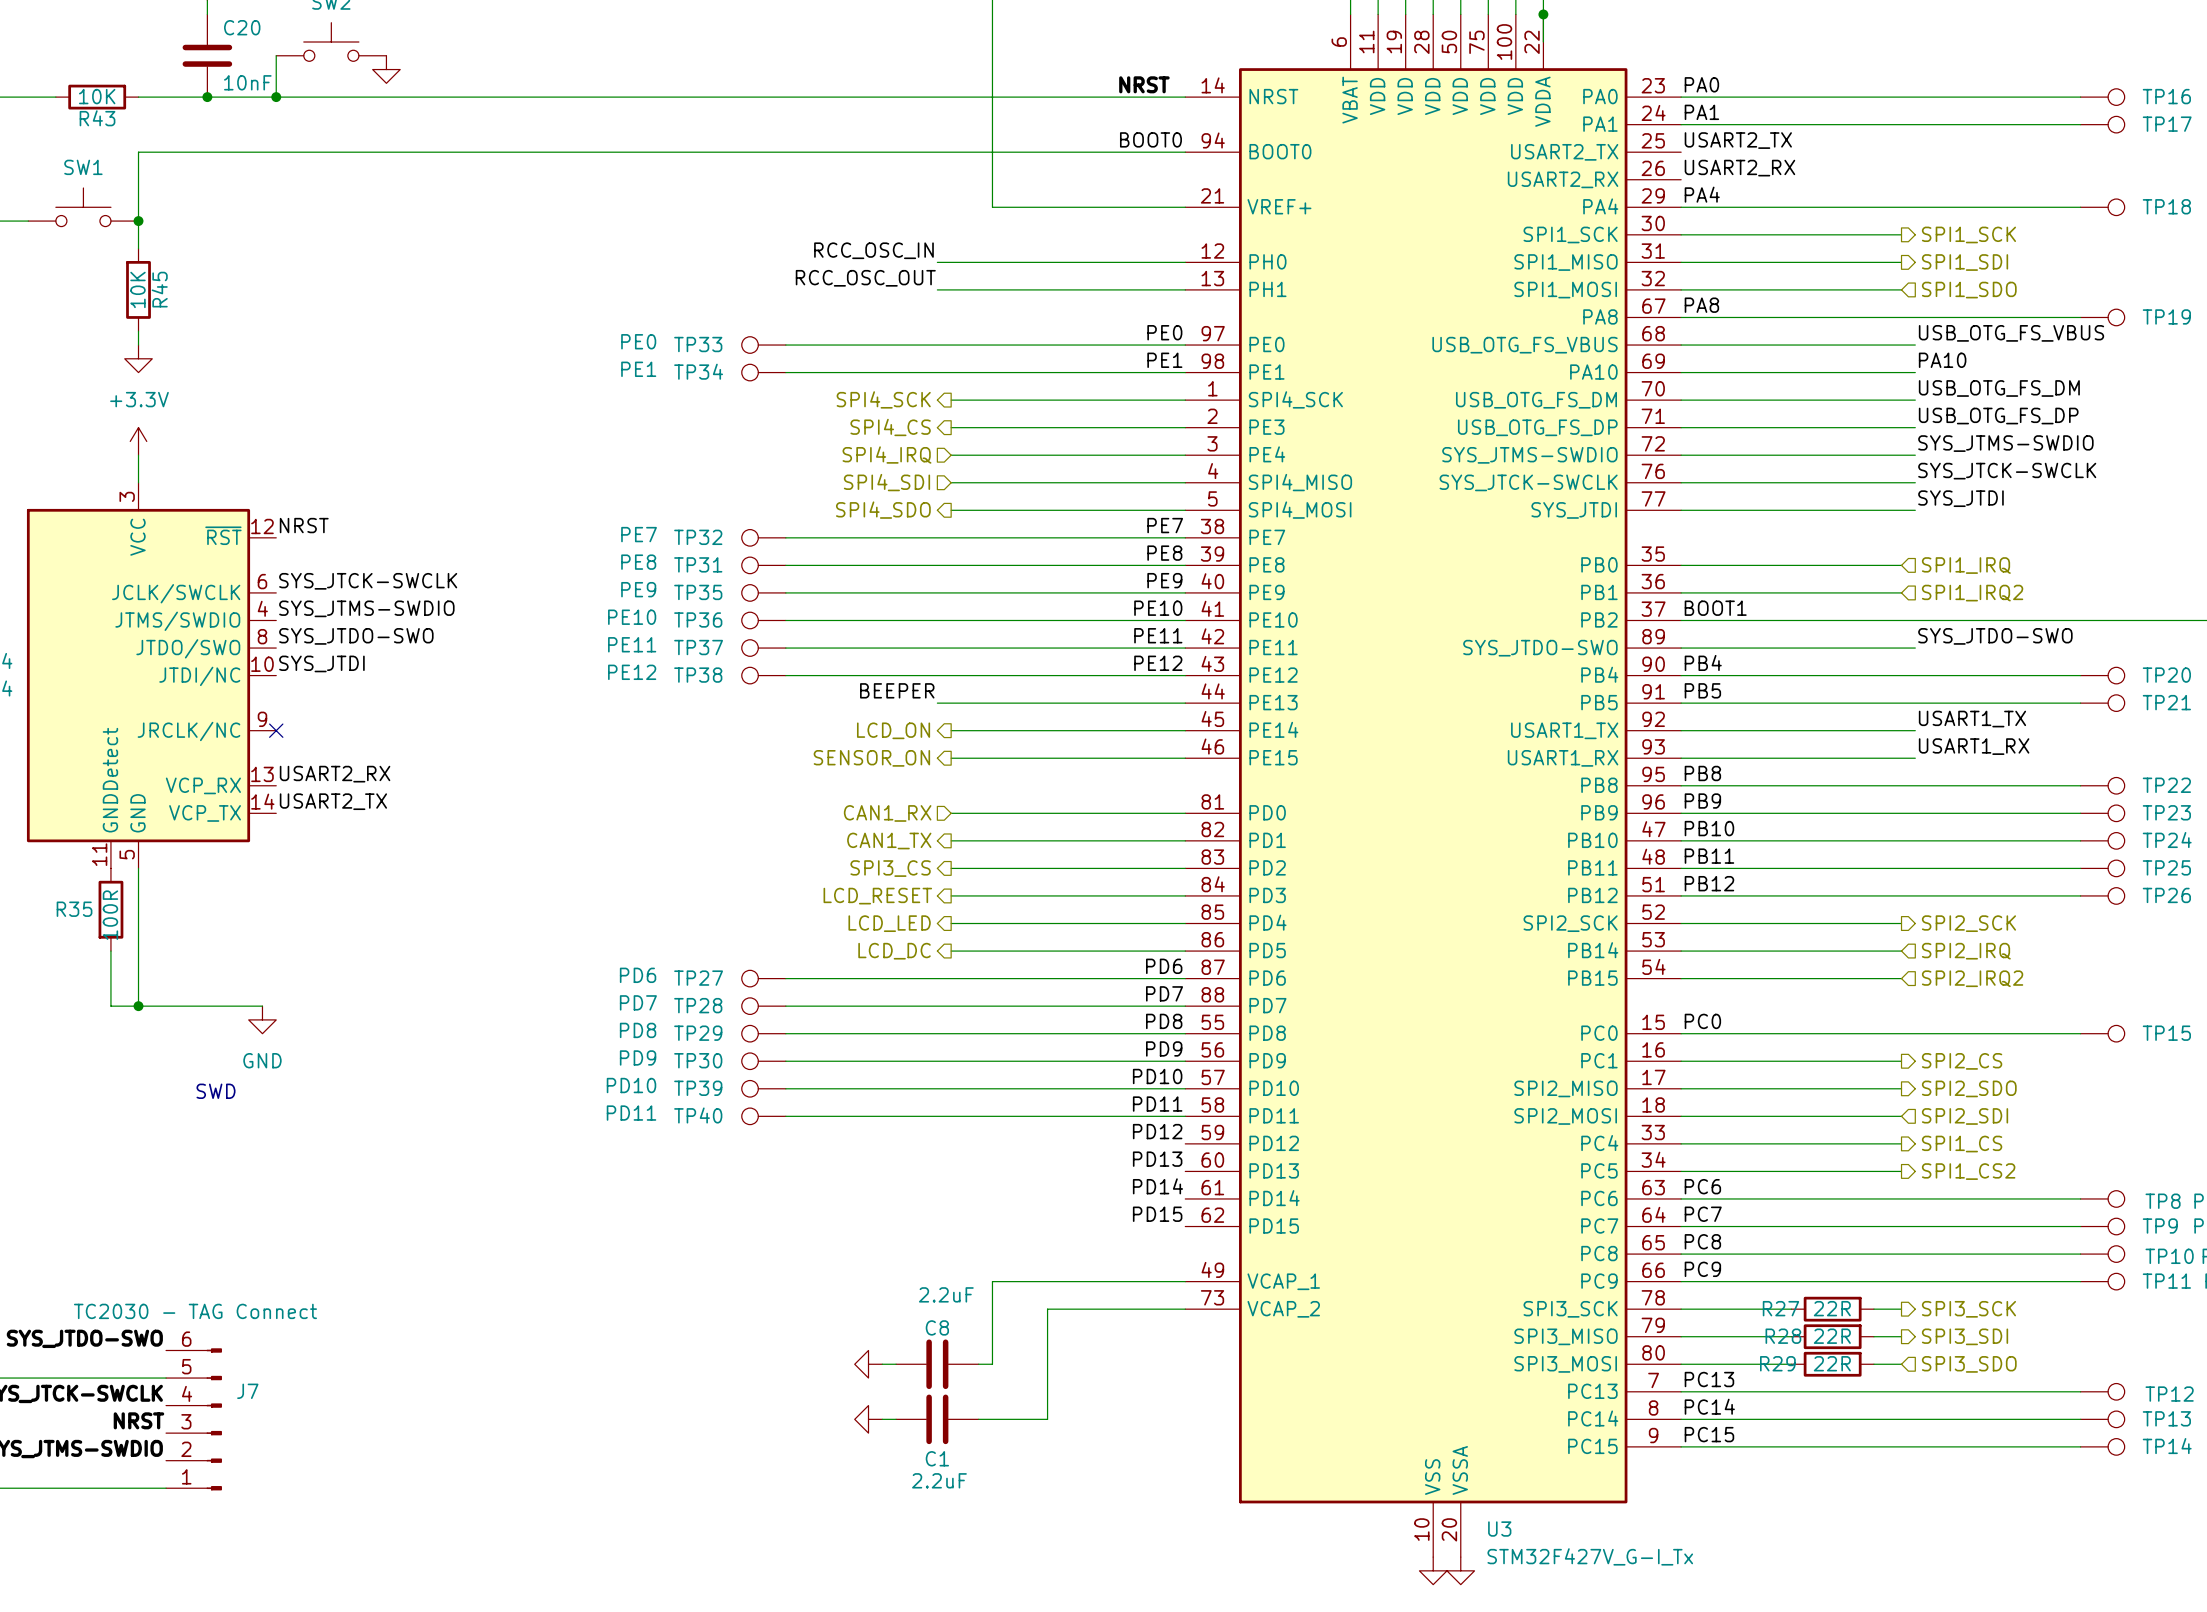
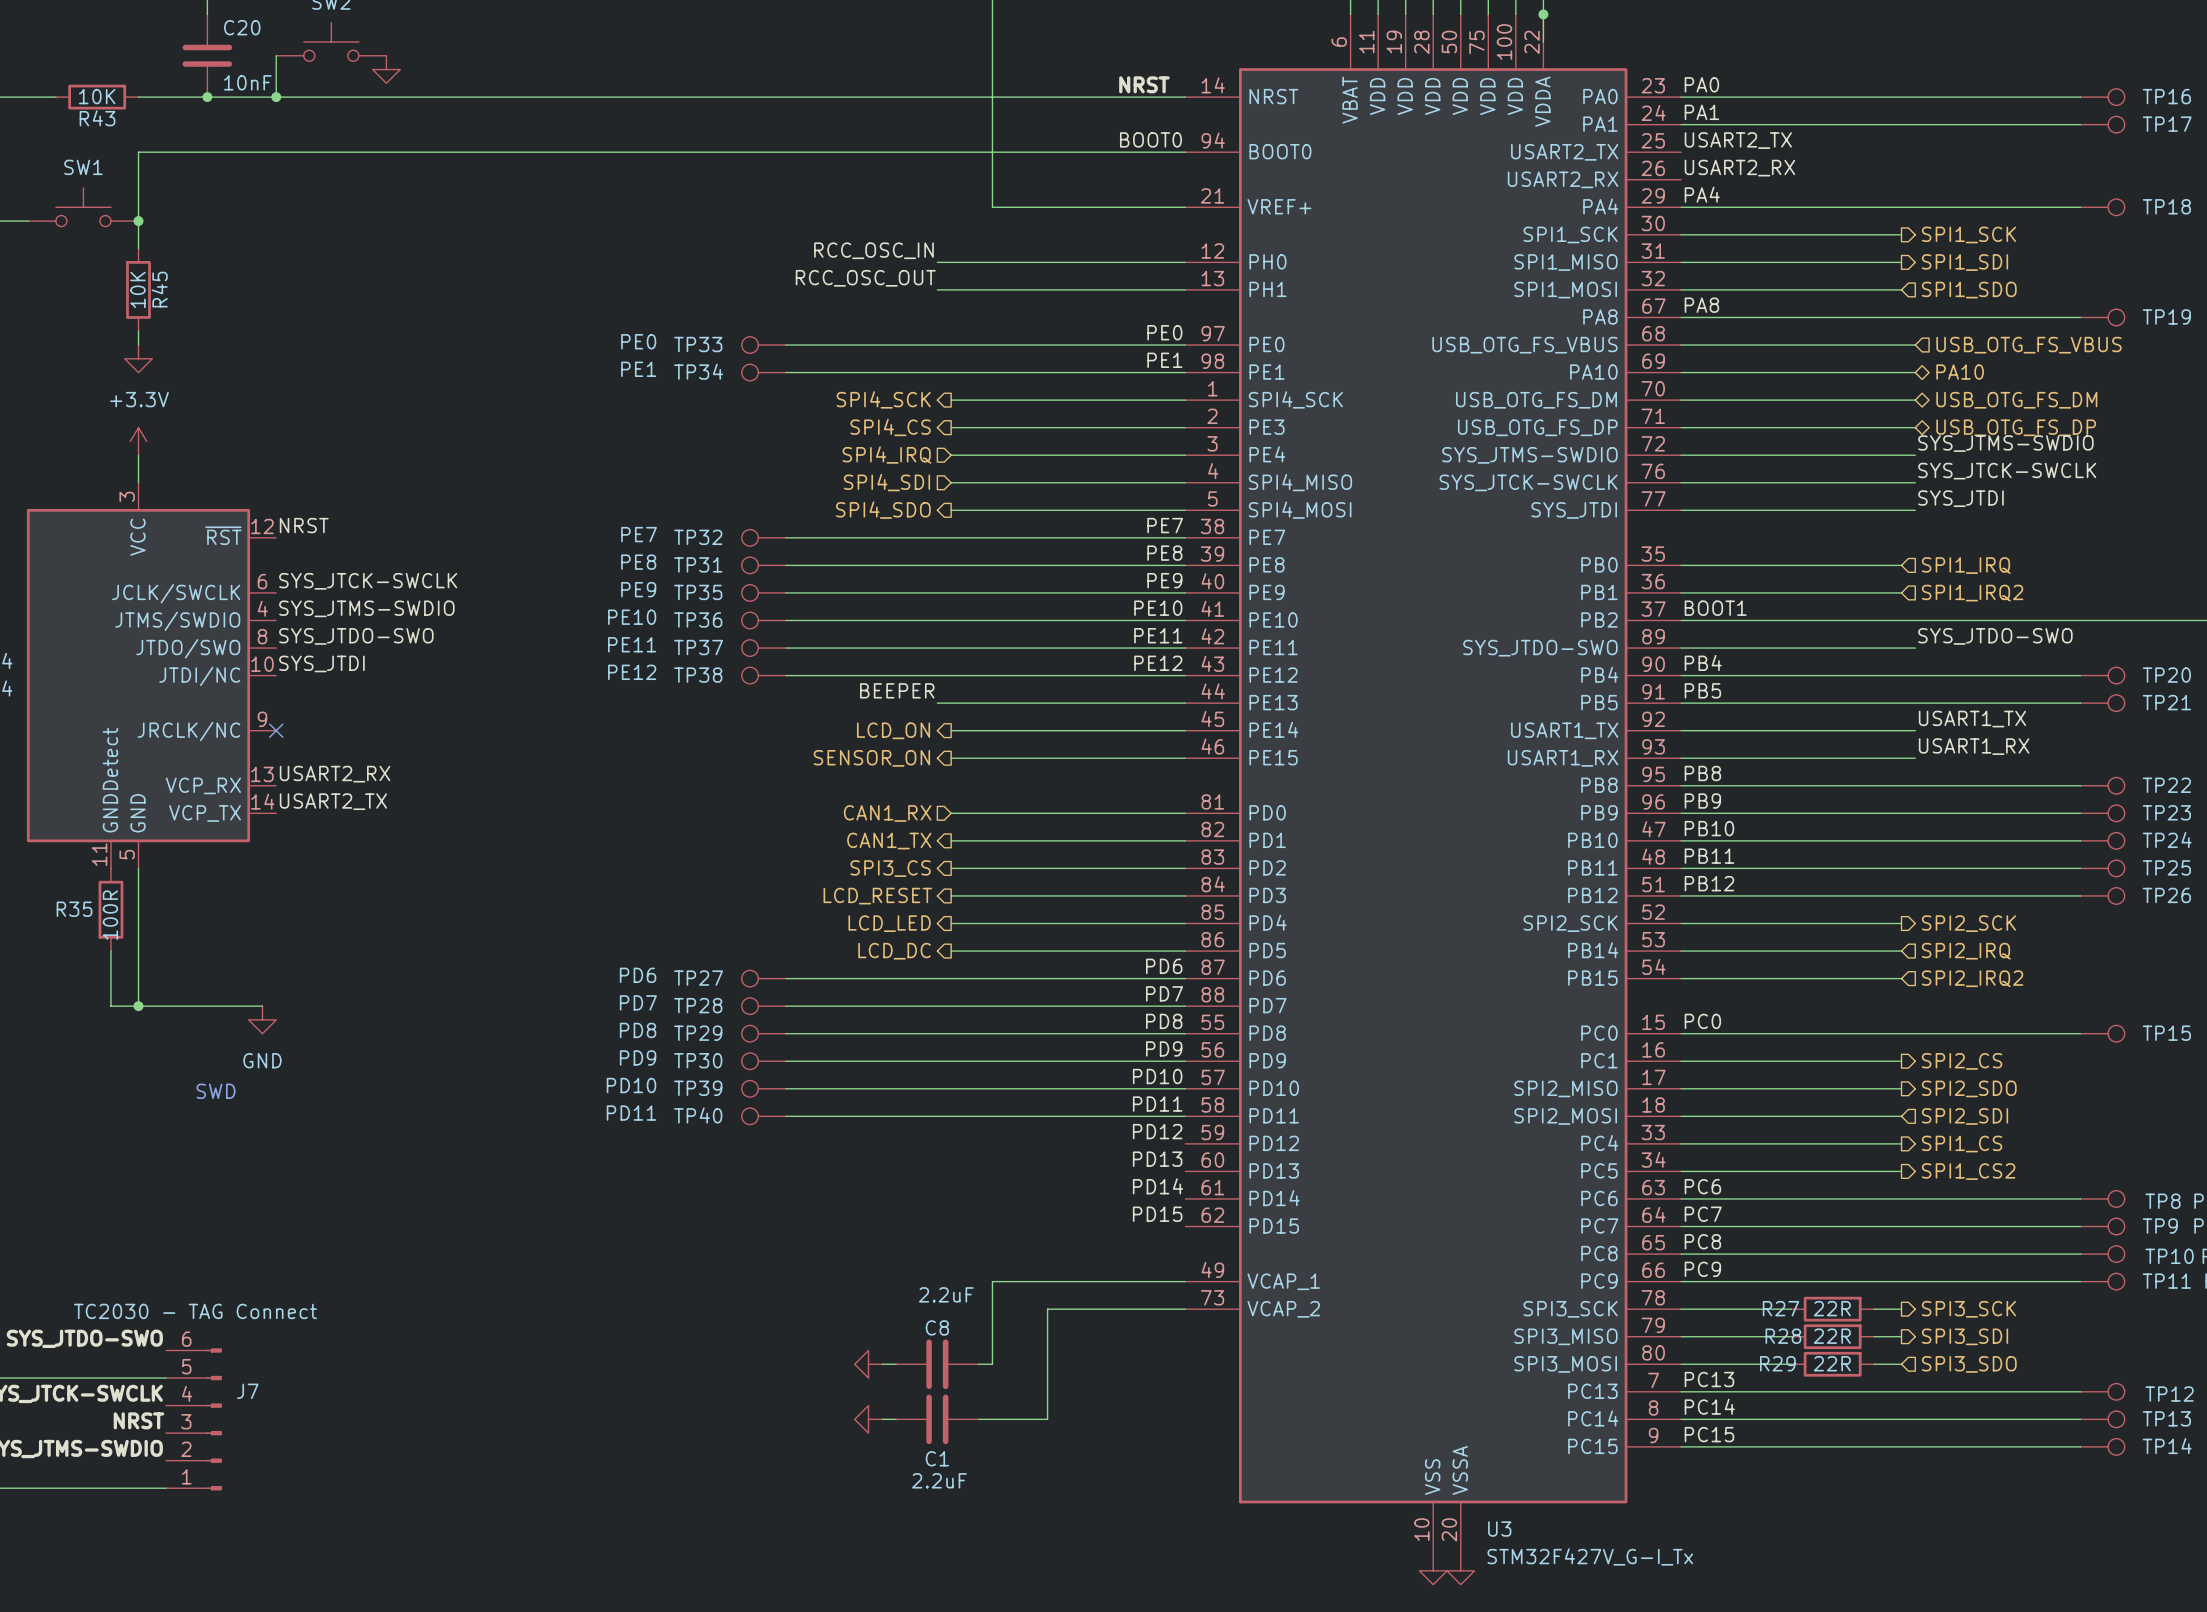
label: USB_OTG_FS_VBUS (2011, 333) -> none
hierarchical label: none -> USB_OTG_FS_VBUS (2028, 345)
label: PA10 (1942, 360) -> none
hierarchical label: none -> PA10 (1960, 372)
label: USB_OTG_FS_DM (1999, 388) -> none
hierarchical label: none -> USB_OTG_FS_DM (2016, 400)
label: USB_OTG_FS_DP (1998, 416) -> none
hierarchical label: none -> USB_OTG_FS_DP (2016, 427)

